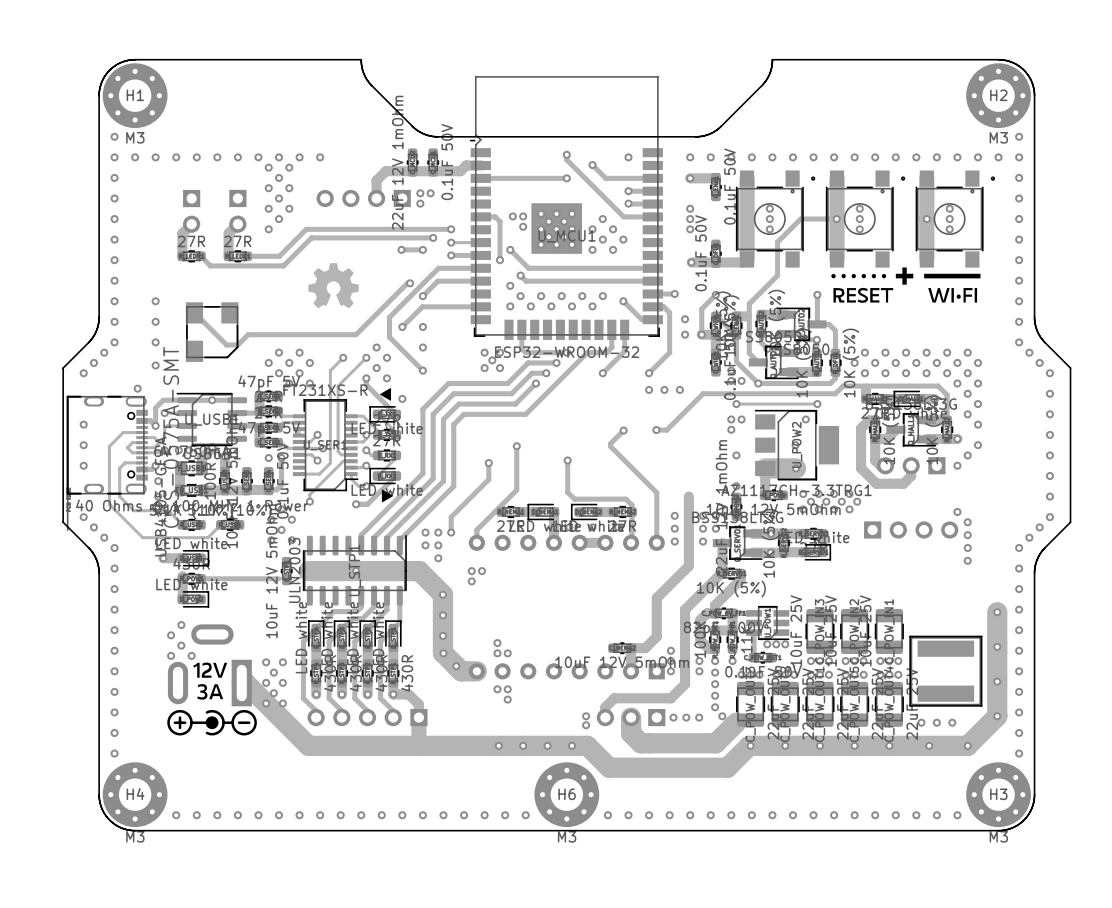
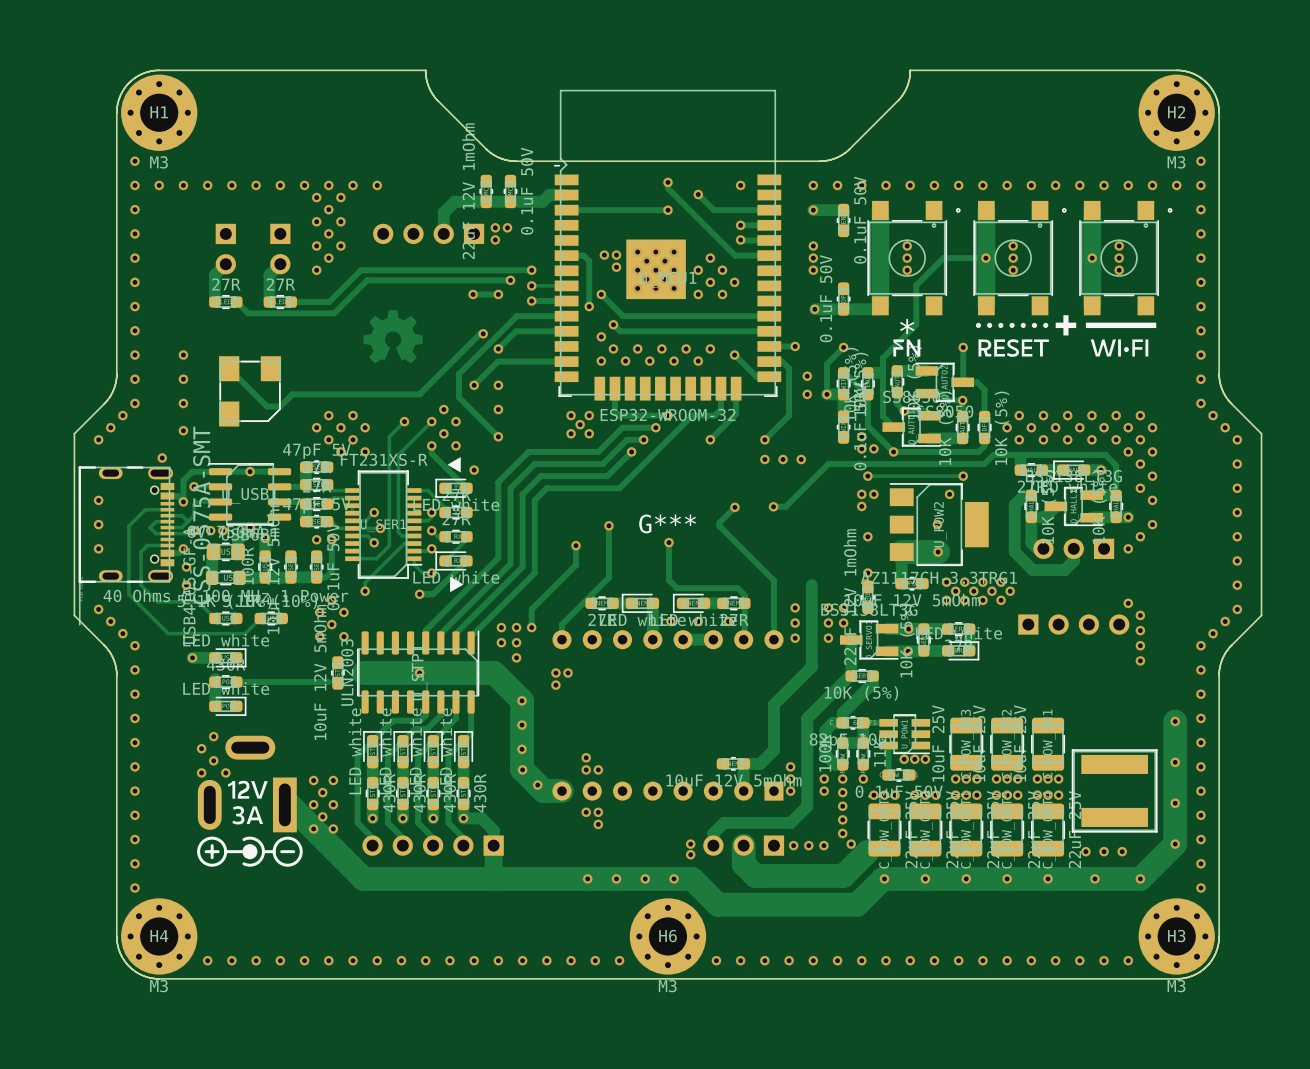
drawing: [193, 267, 981, 700] -> none
text: none -> * (907, 326)
G***: none -> (692, 569)

